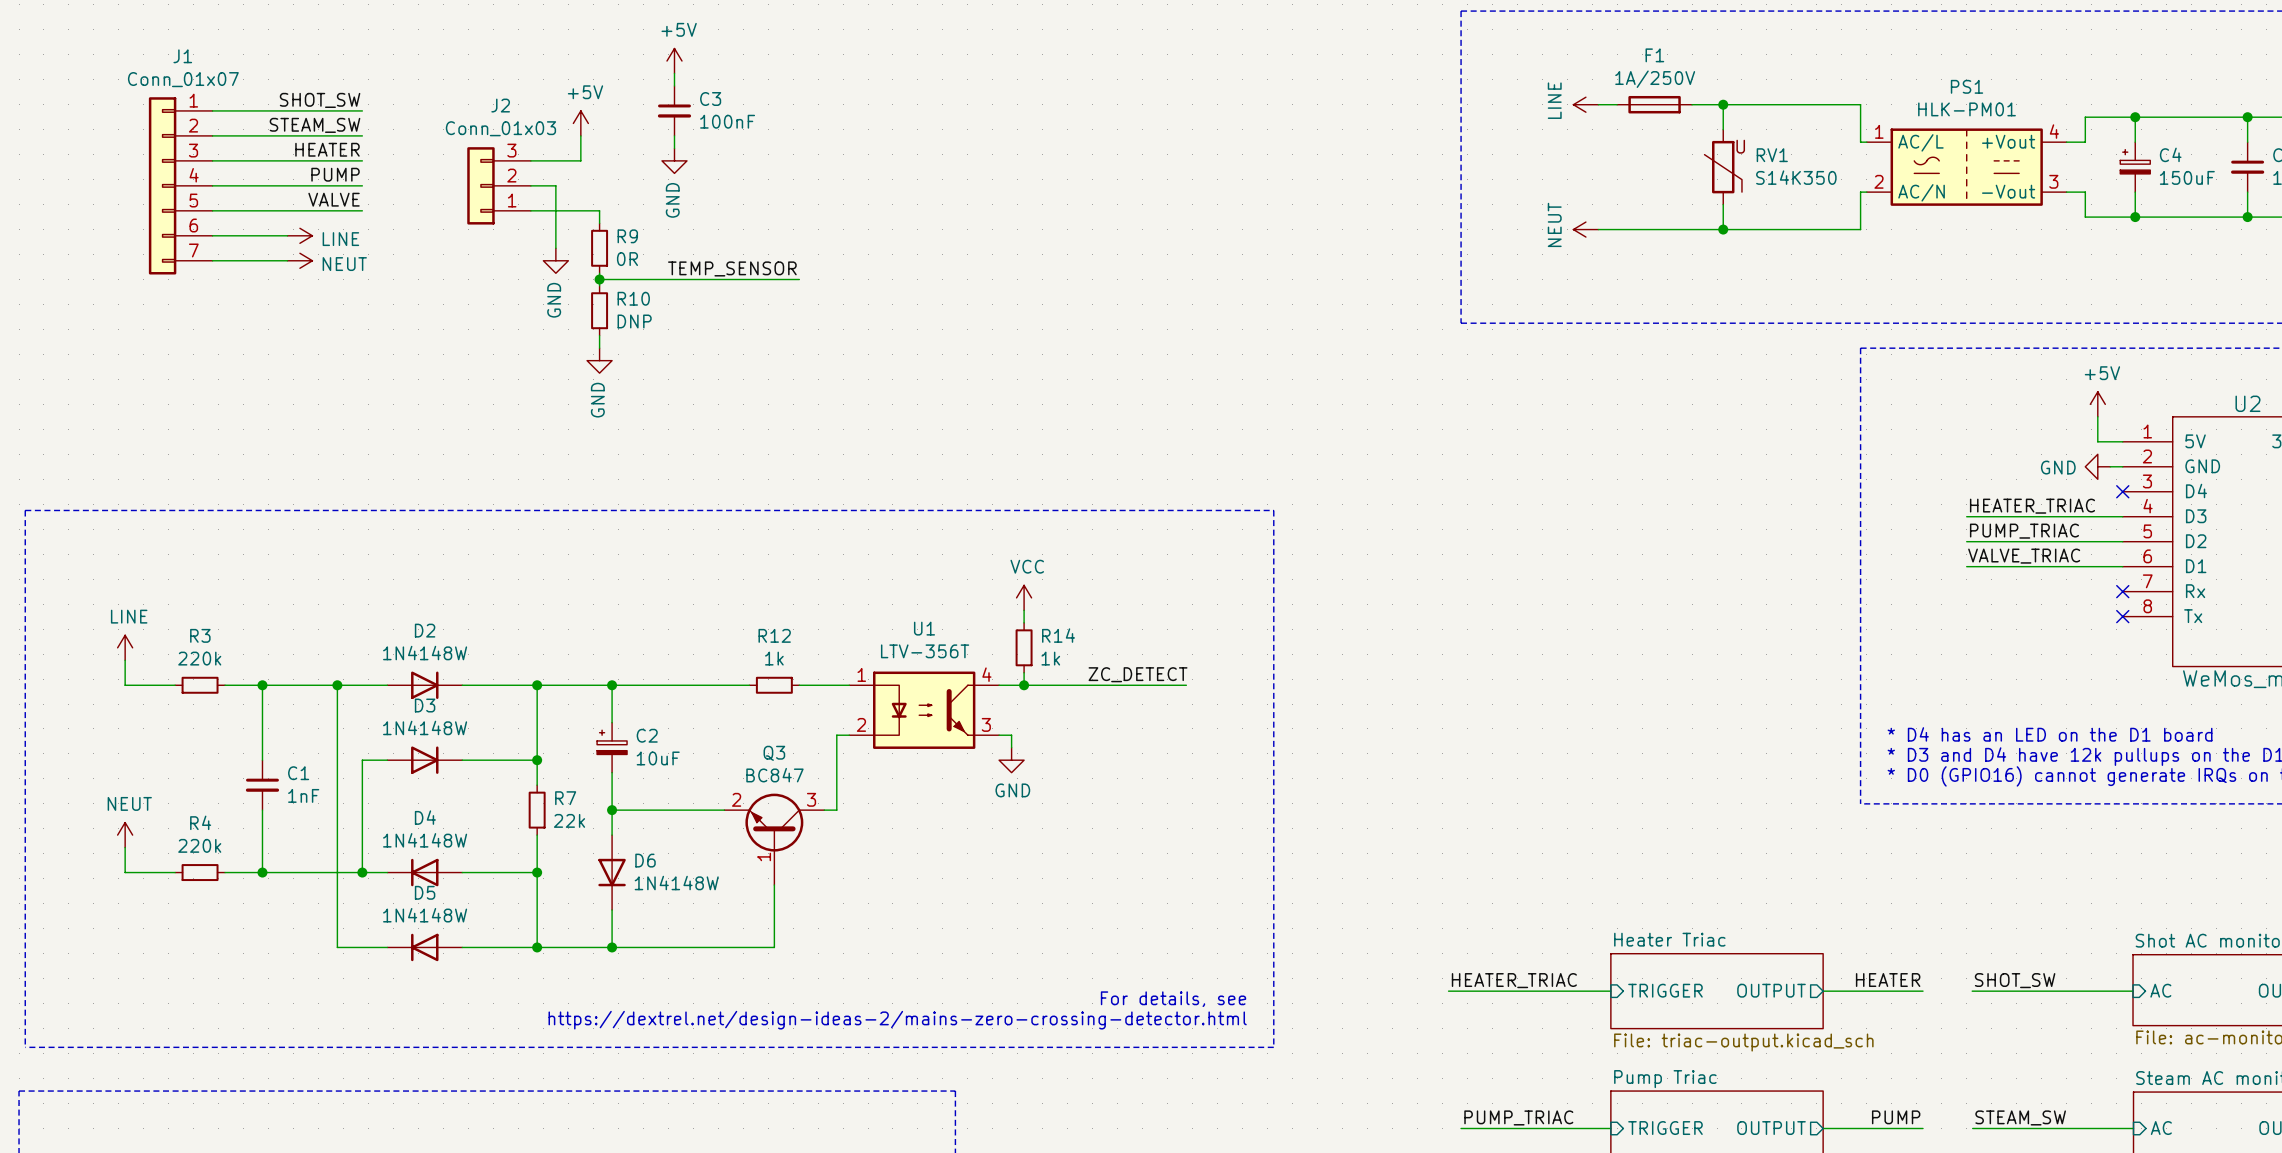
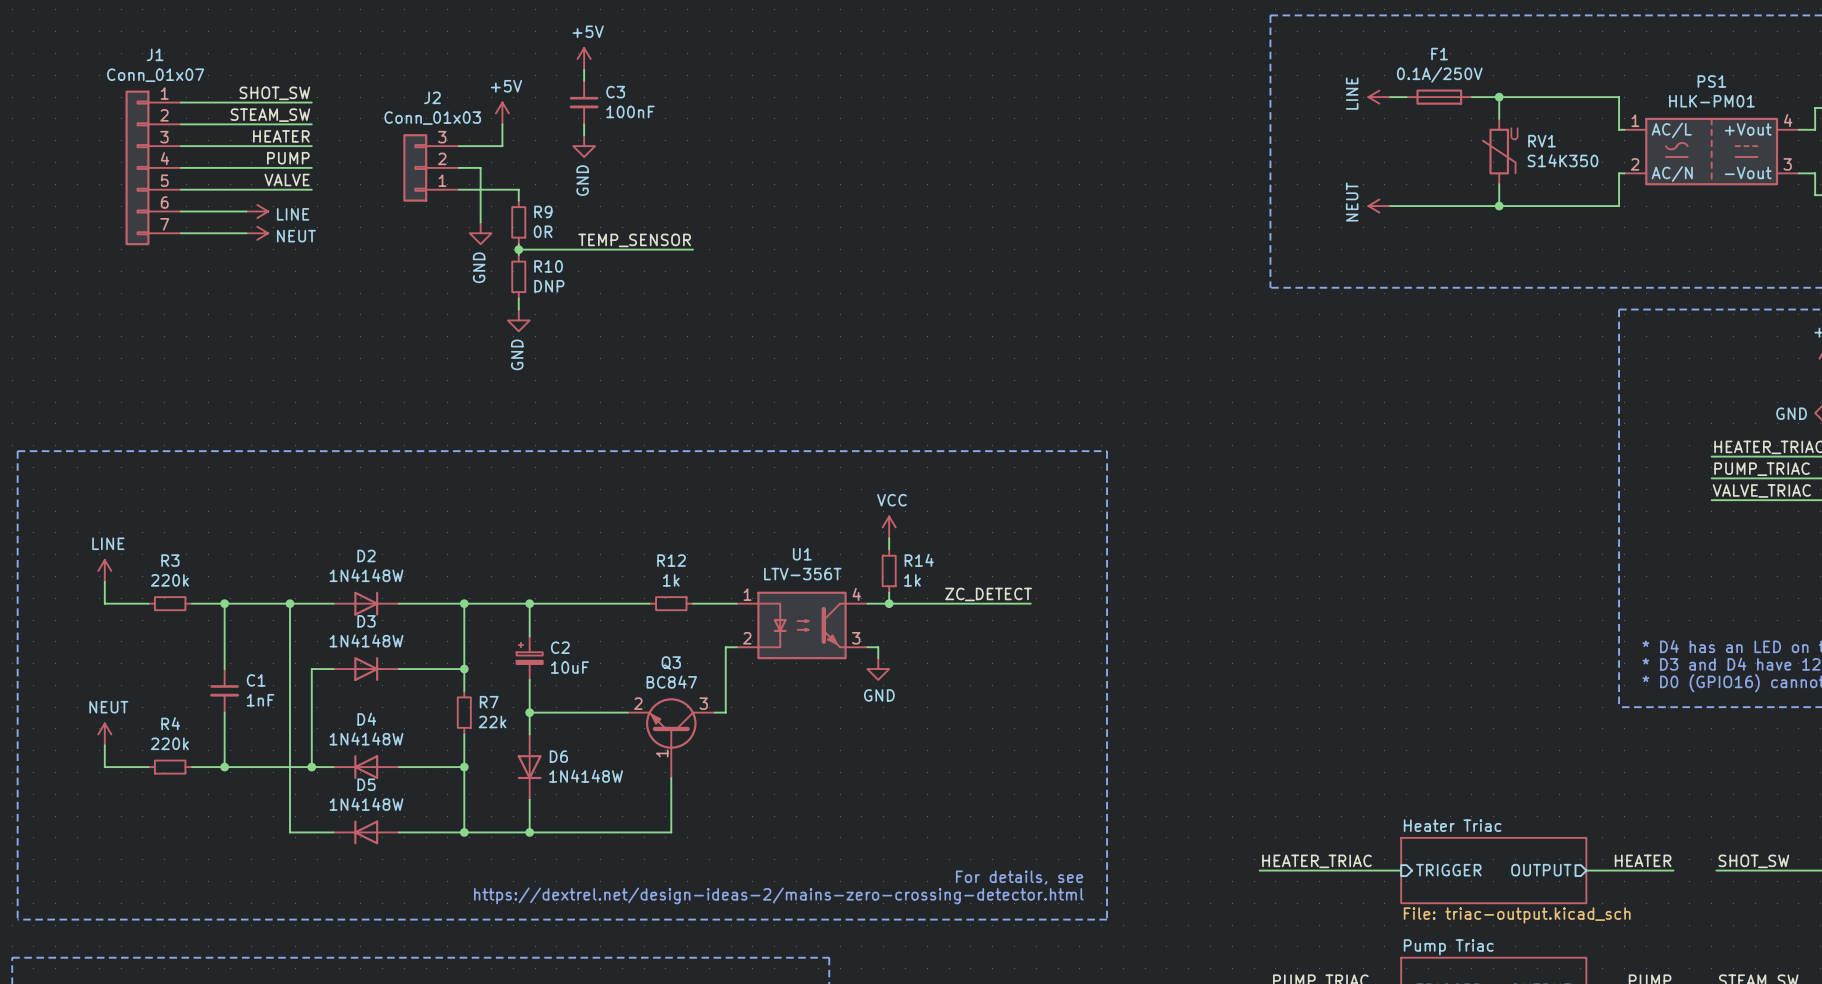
F1 value: 1A/250V (1655, 79) -> 0.1A/250V (1439, 74)

